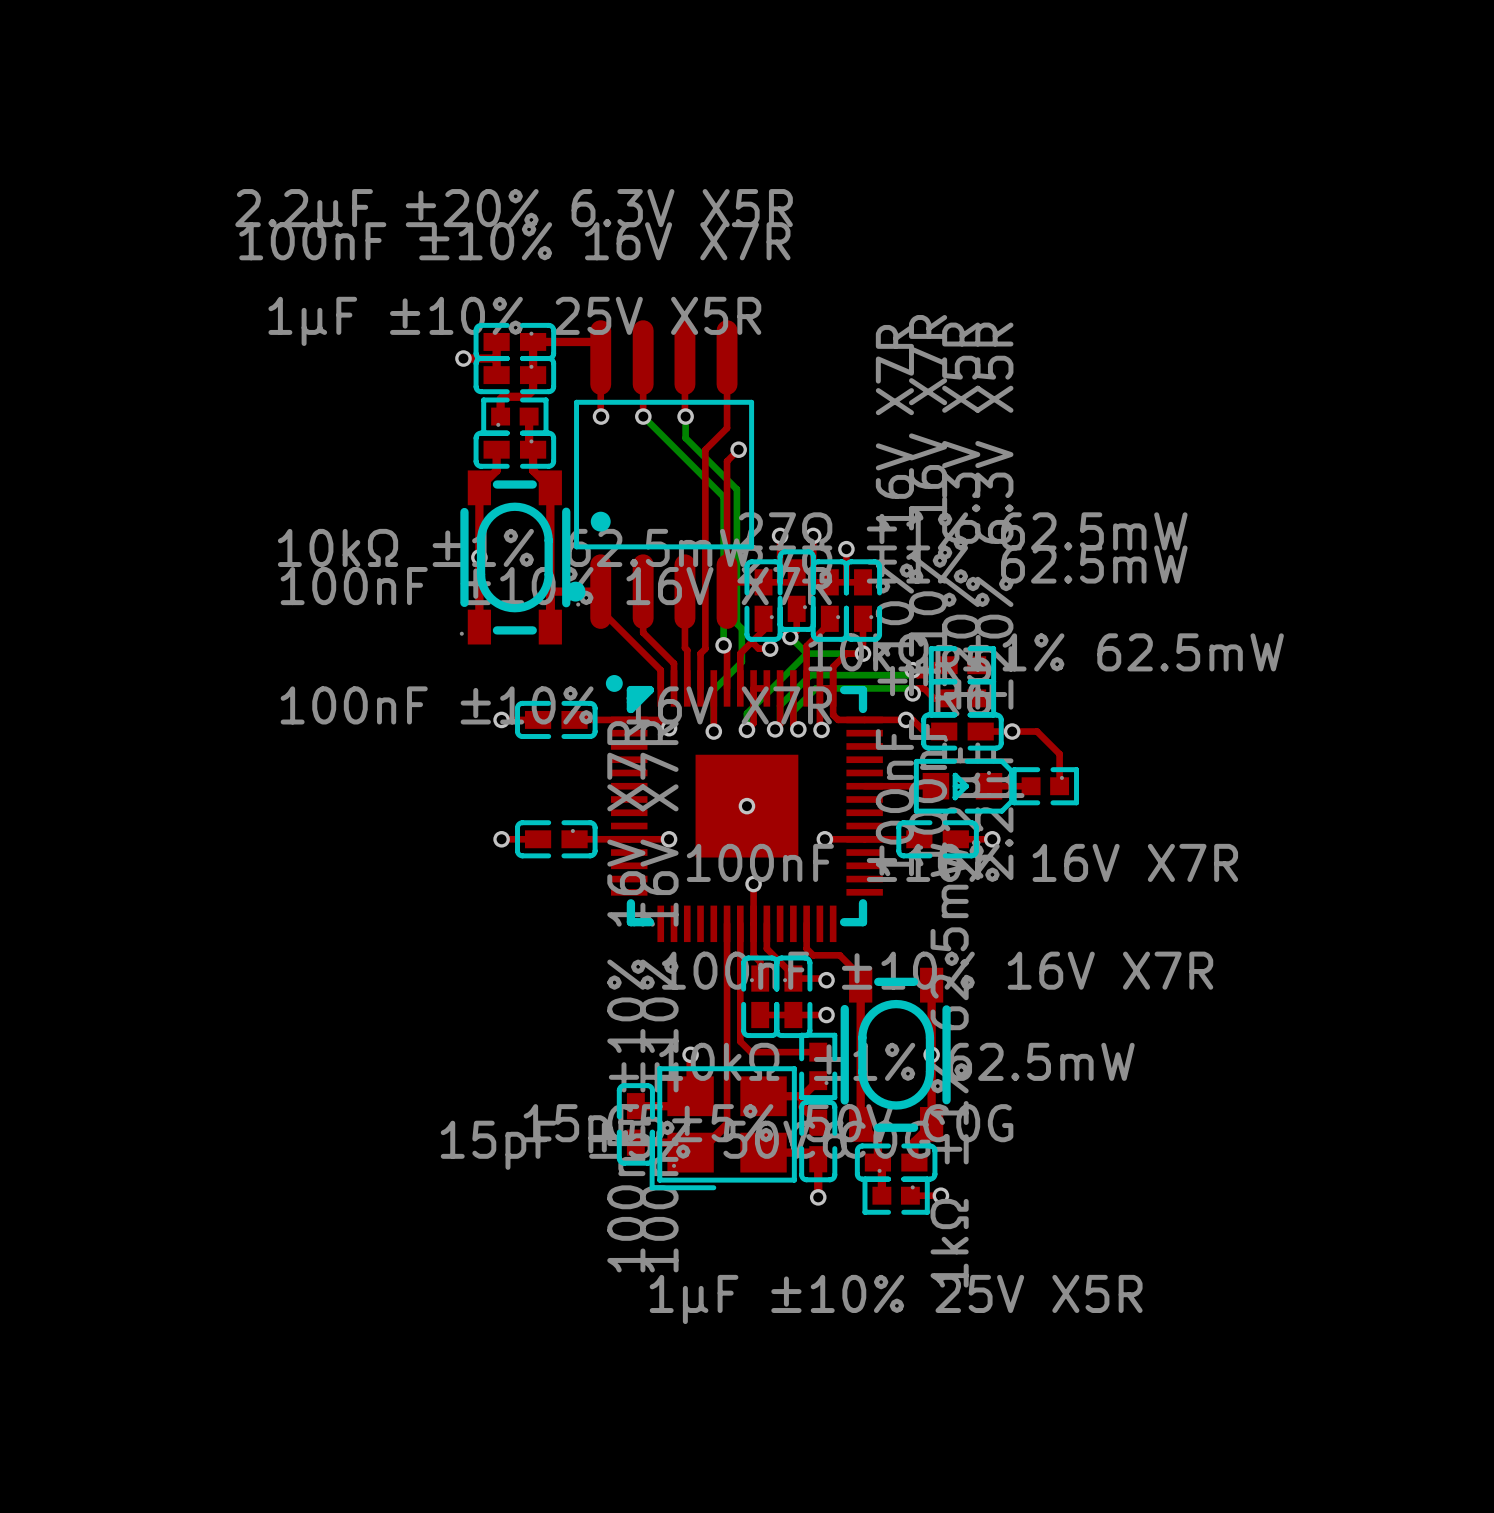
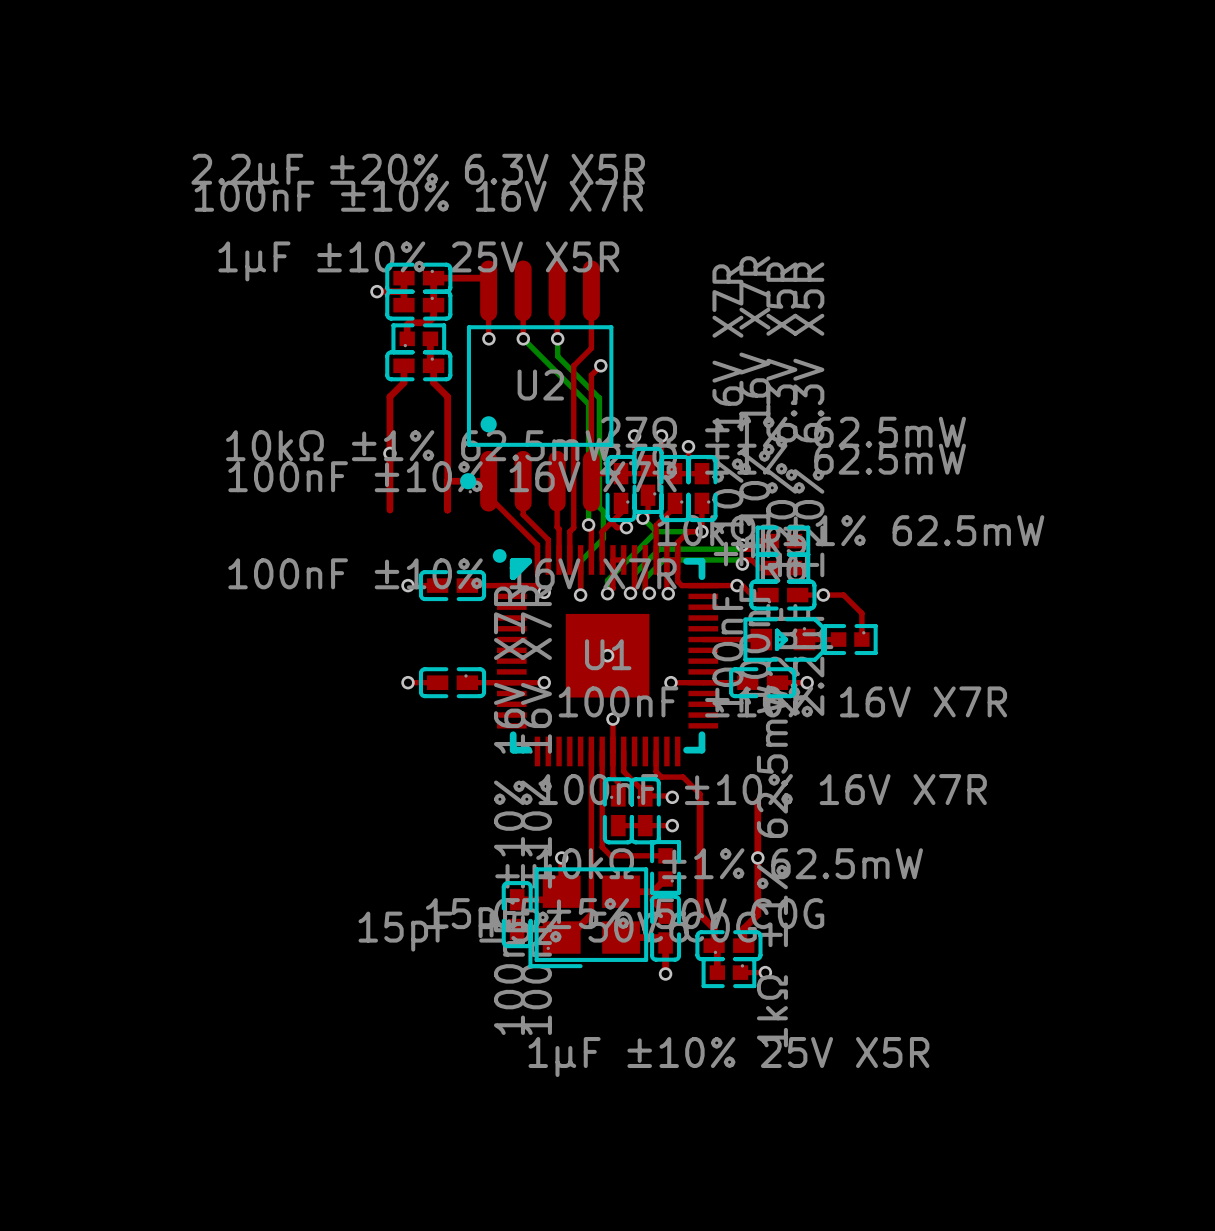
U2 name: none -> U2 (540, 385)
part: (515, 557) -> none
U1 name: none -> U1 (608, 654)
part: (895, 1054) -> none

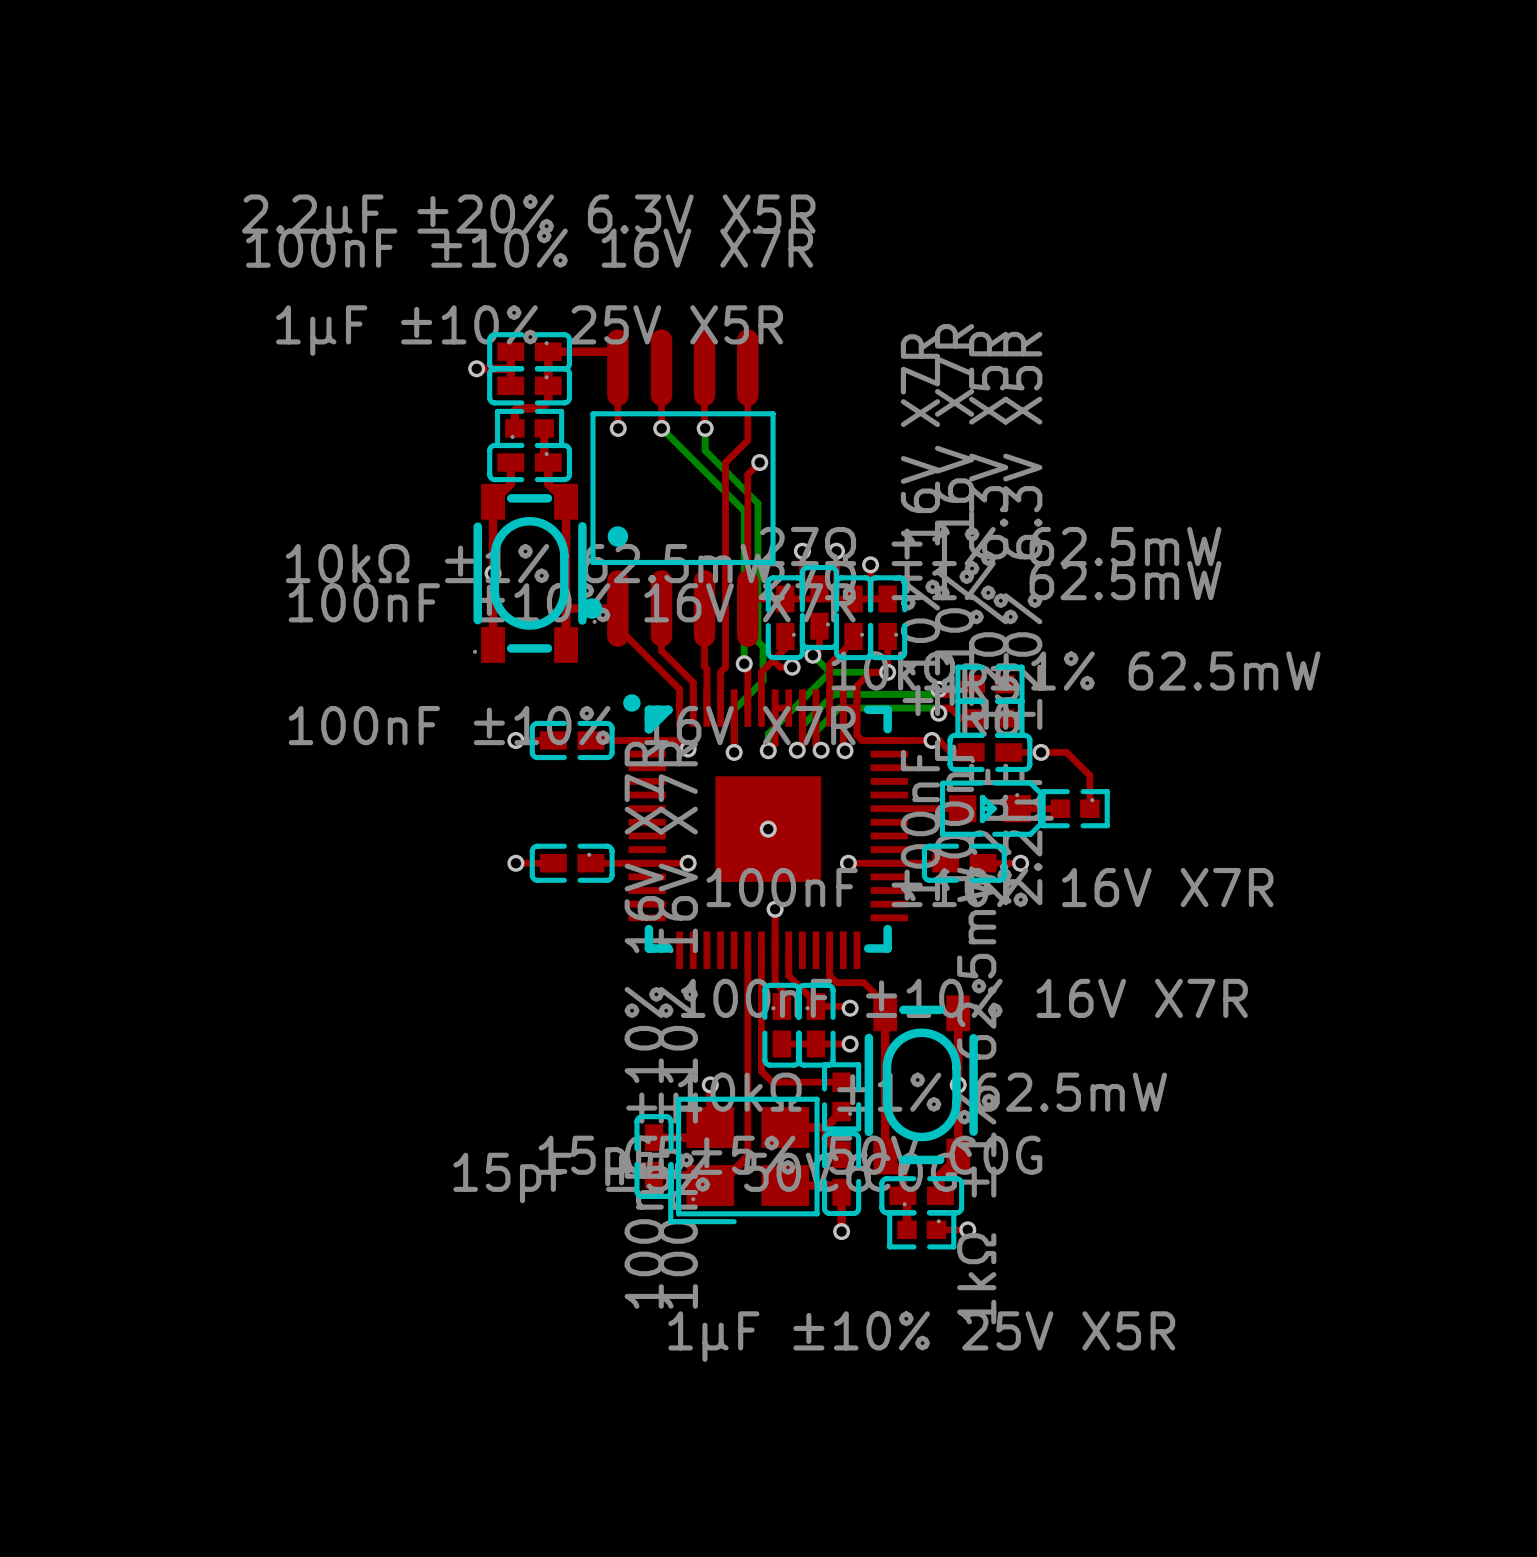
U2 name: U2 (540, 385) -> none
part: none -> (529, 573)
U1 name: U1 (608, 654) -> none
part: none -> (921, 1084)

